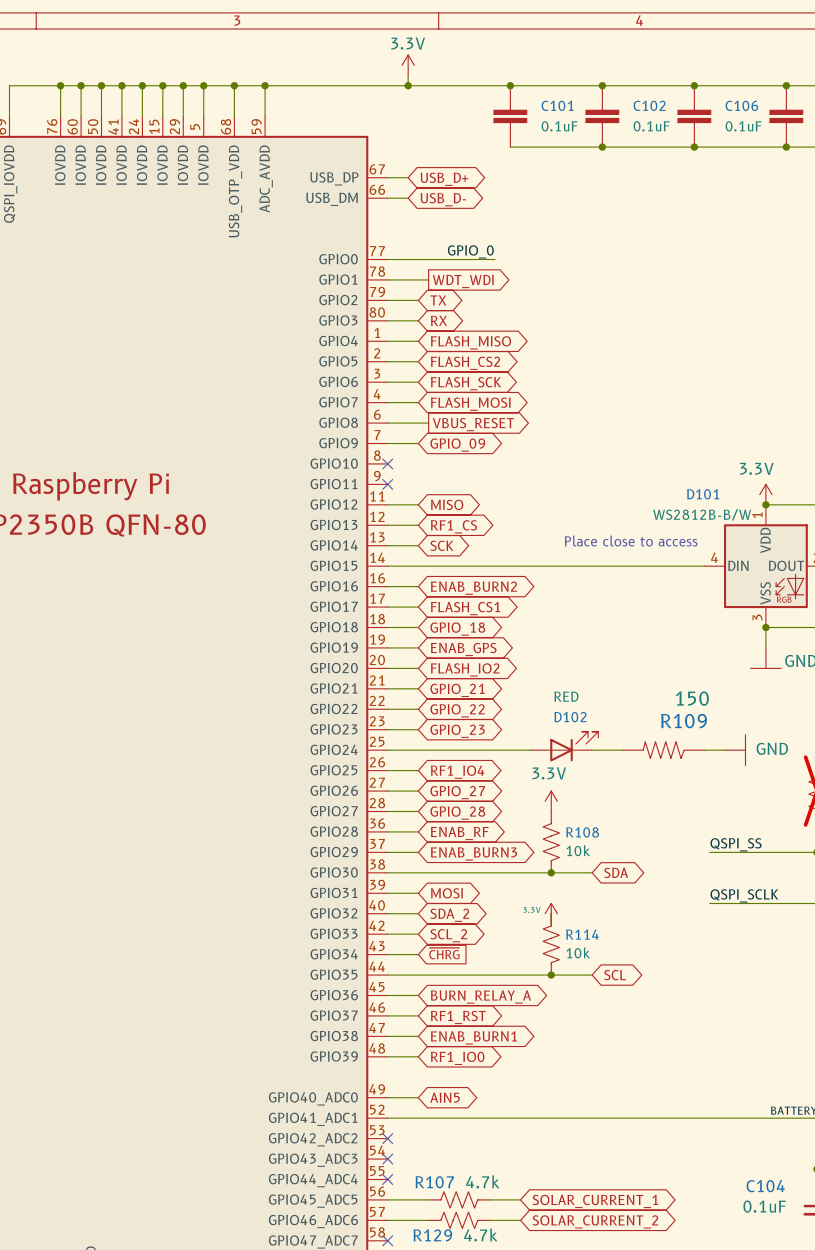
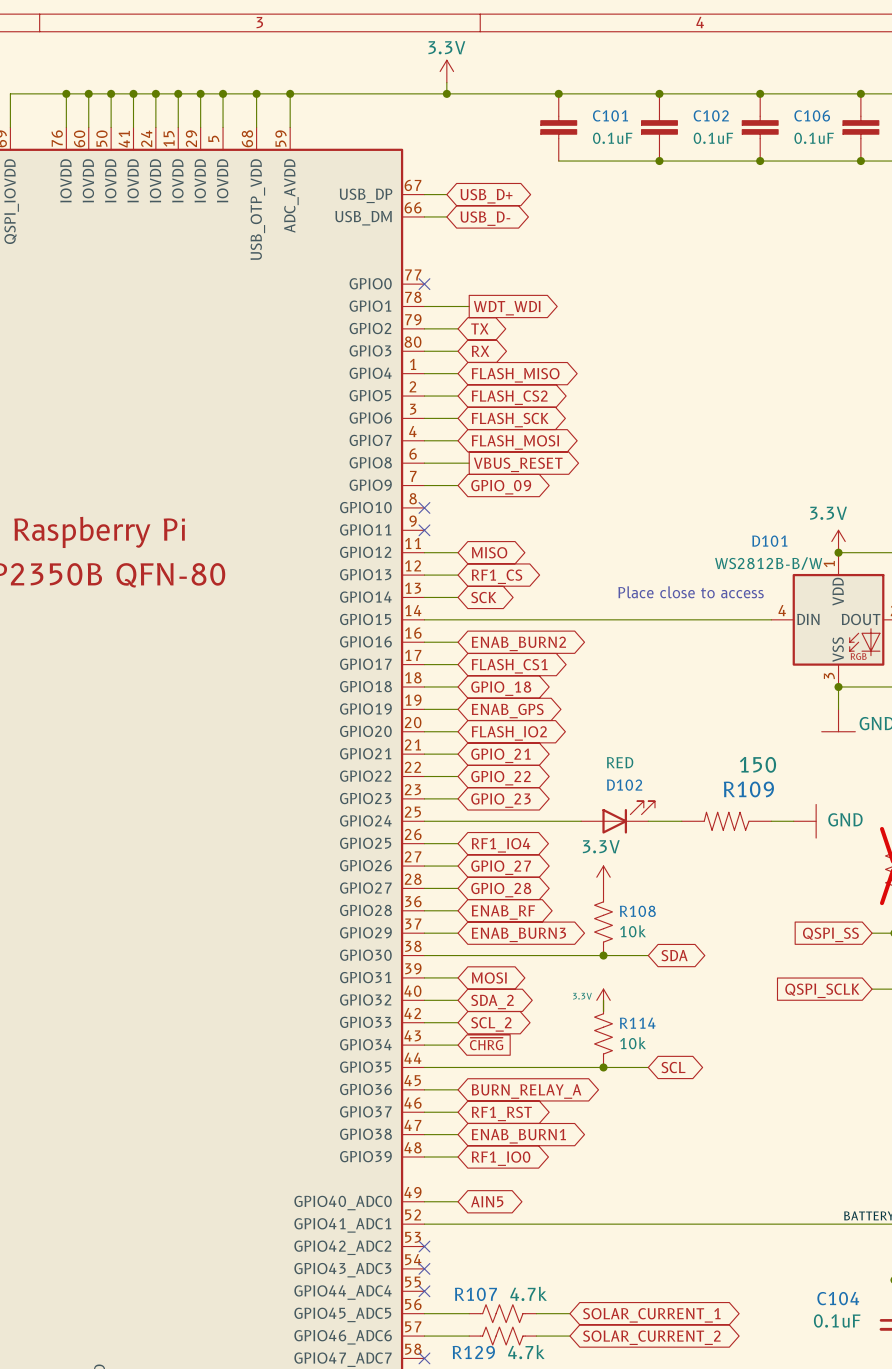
label: GPIO_0 (470, 251) -> none
wire: (387, 259) (495, 259) -> none
no-connect mark: none -> (424, 284)
label: QSPI_SS (736, 844) -> none
wire: (709, 852) (796, 852) -> none
global label: none -> QSPI_SS (830, 934)
label: QSPI_SCLK (744, 895) -> none
wire: (709, 903) (796, 903) -> none
global label: none -> QSPI_SCLK (822, 990)

